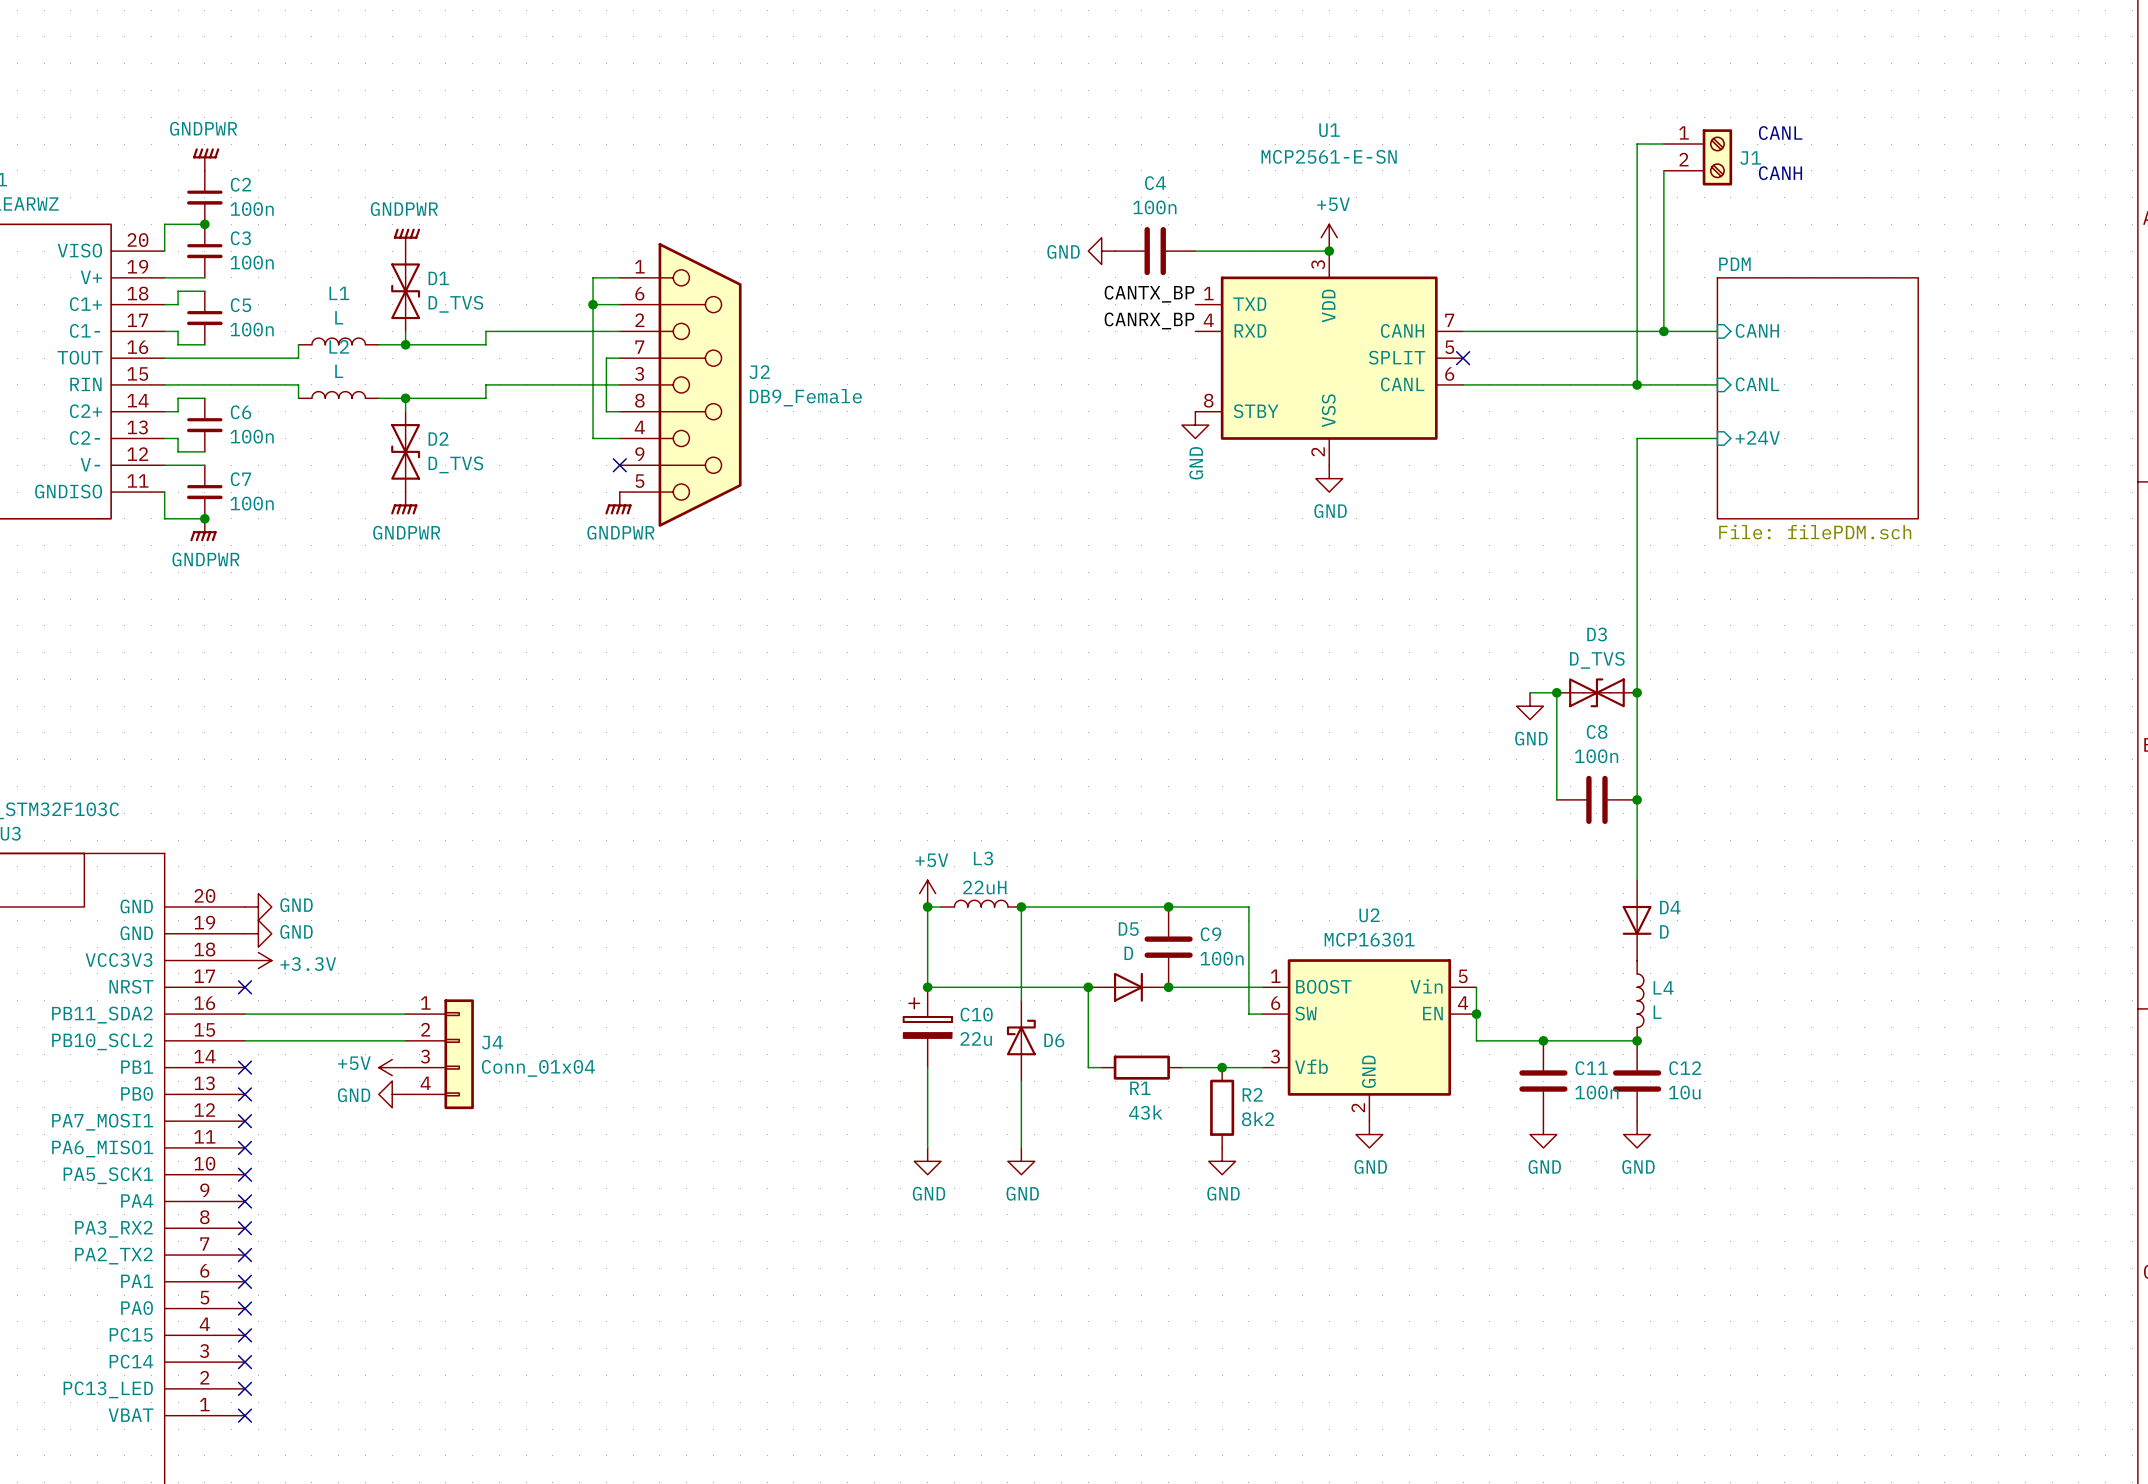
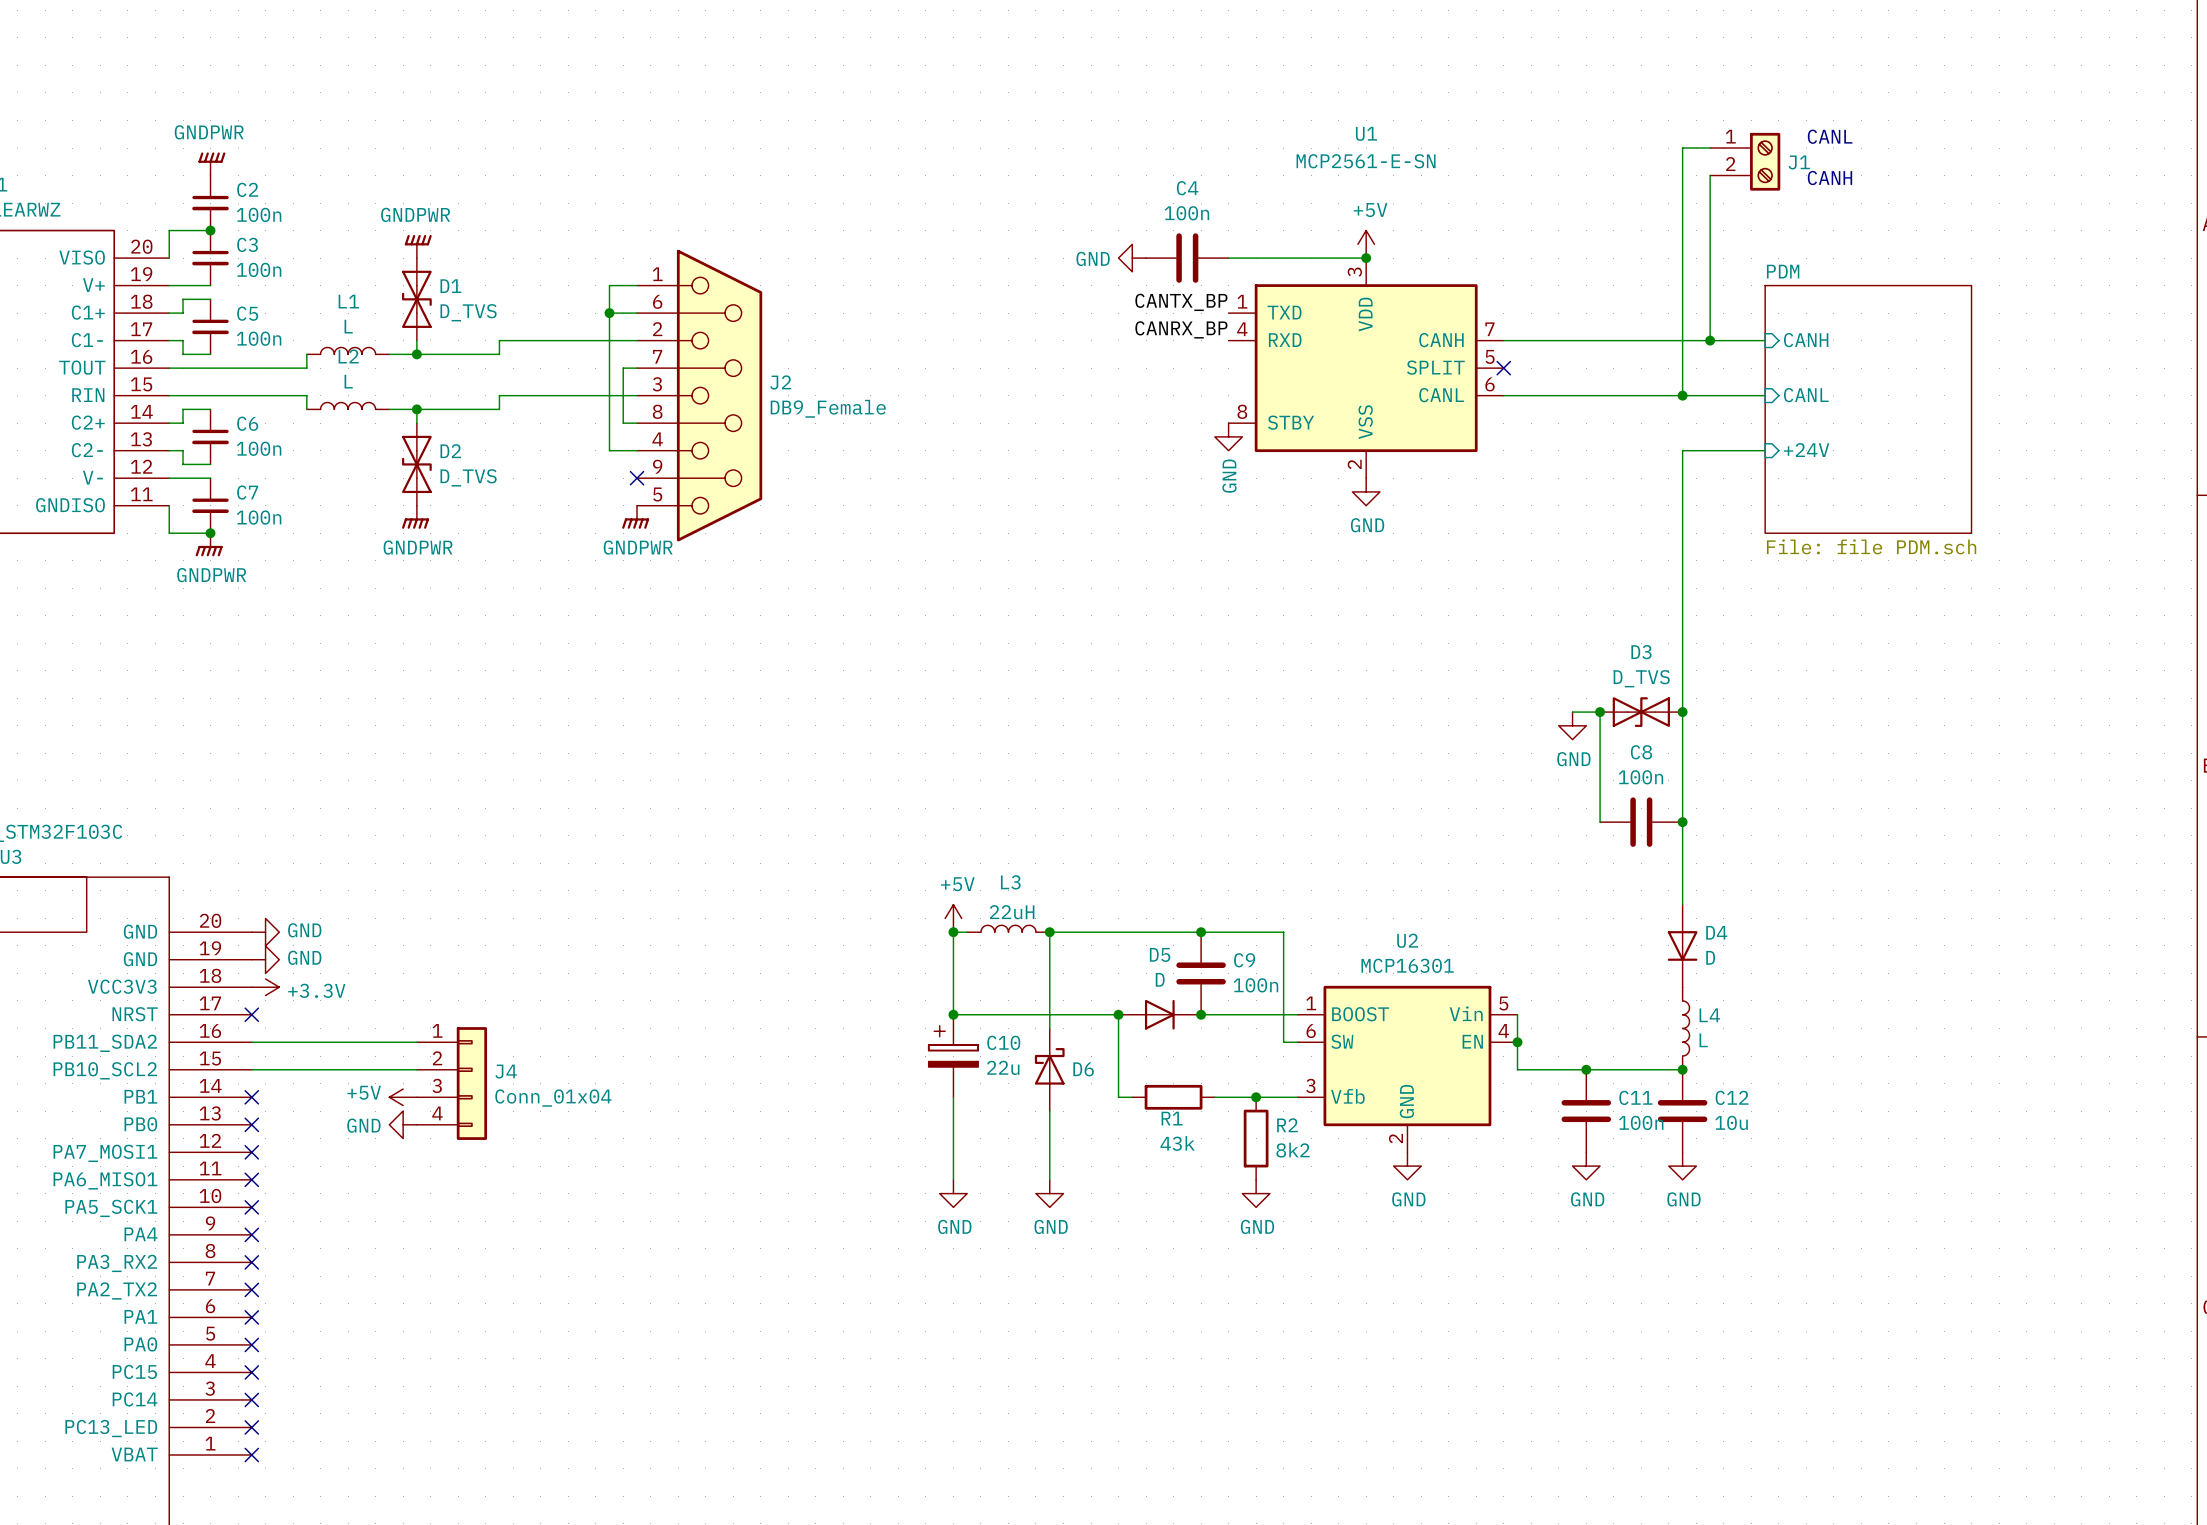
sheet PDM value: File: filePDM.sch (1815, 532) -> File: file PDM.sch (1871, 546)

